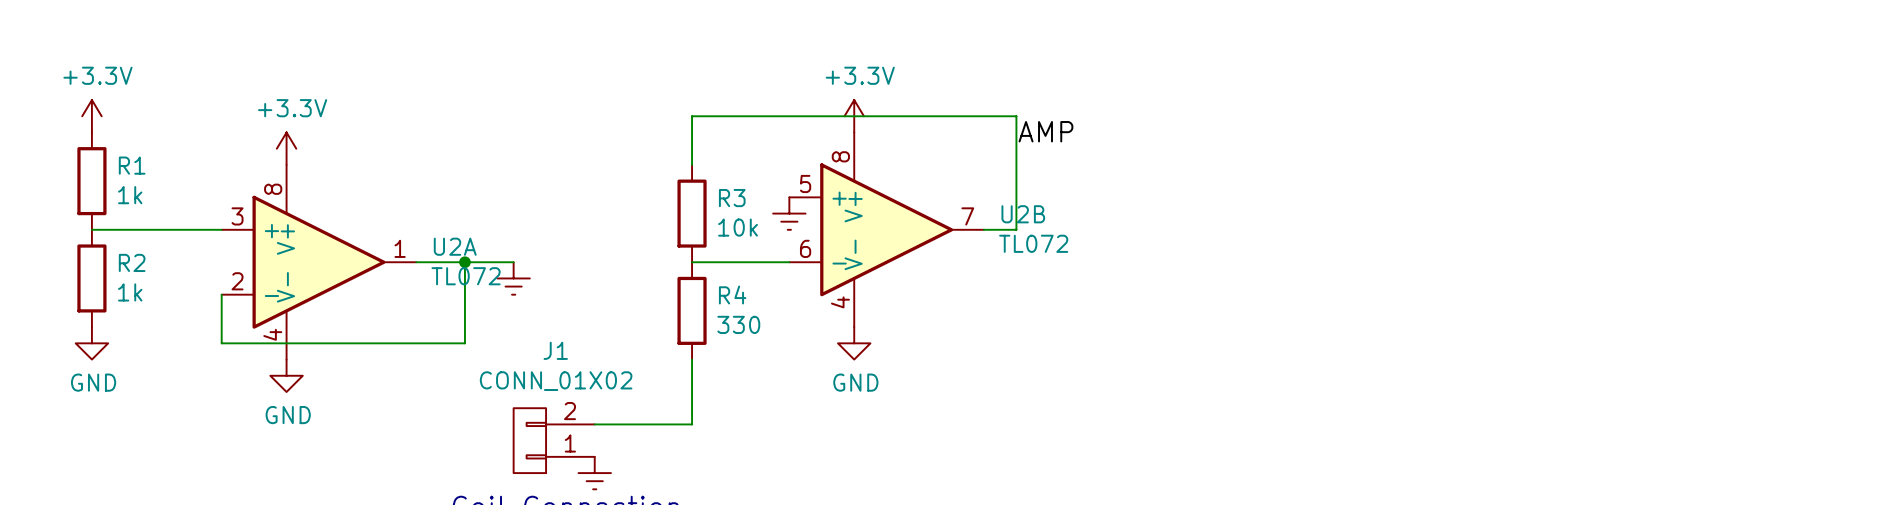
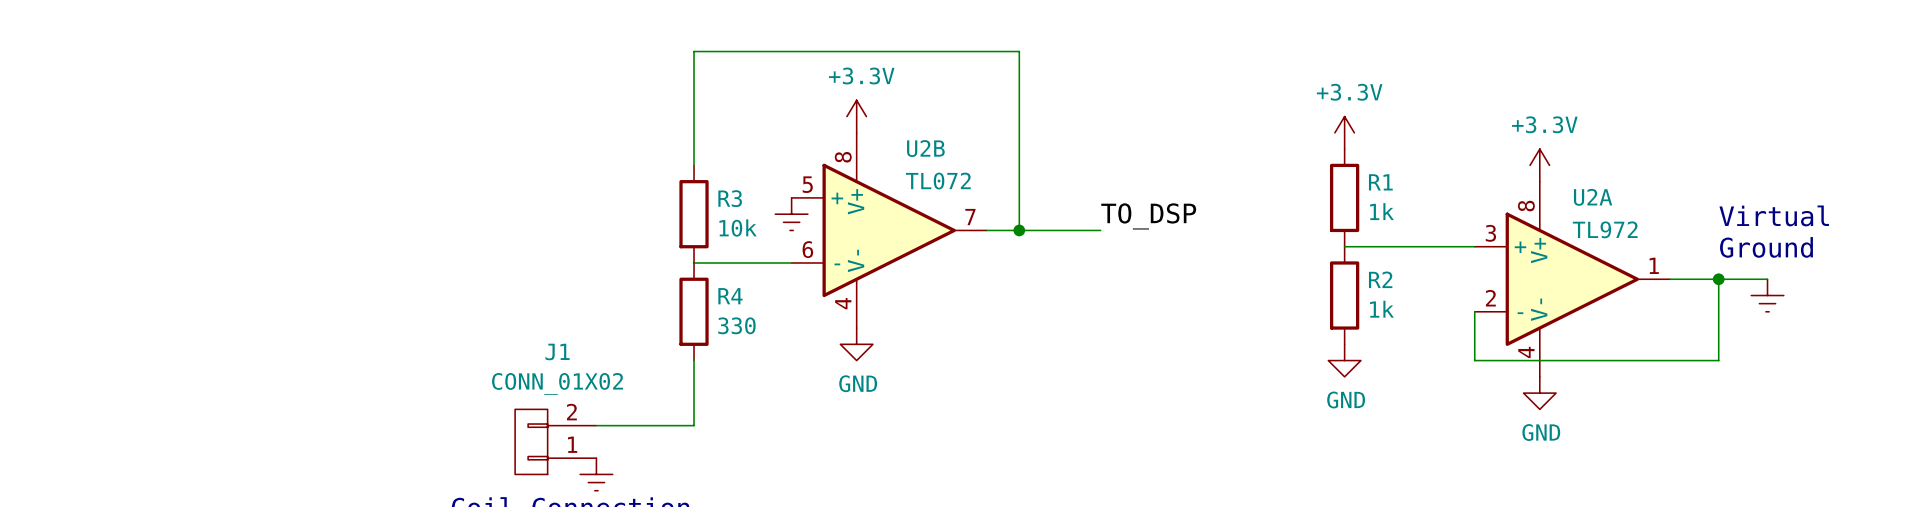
power symbol: +3.3V (91, 116) -> none
wire: (692, 116) (1016, 116) -> (694, 116) (694, 51) (1019, 51) (1019, 116)
label: AMP (1045, 131) -> none
power symbol: none -> +3.3V (1344, 132)
power symbol: +3.3V (286, 148) -> none
power symbol: none -> +3.3V (1539, 165)
R1 position: (91, 181) -> (1344, 197)
label: none -> TO_DSP (1148, 216)
U2B name position: U2B (1023, 214) -> U2B (925, 148)
text: none -> Virtual (1774, 215)
wire: (91, 229) (221, 229) -> none
wire: none -> (1019, 230) (1100, 230)
junction: none -> (1019, 230)
U2B value position: TL072 (1033, 243) -> TL072 (938, 181)
U2A name position: U2A (455, 246) -> U2A (1593, 197)
wire: none -> (1344, 246) (1474, 246)
text: none -> Ground (1766, 247)
U2A position: (319, 262) -> (1572, 279)
wire: (416, 262) (513, 262) -> none
wire: (464, 262) (464, 343) (221, 343) (221, 294) -> none
junction: (464, 262) -> none
U2A value: TL072 (466, 276) -> TL972 (1605, 229)
R2 position: (91, 278) -> (1344, 295)
power symbol: (513, 278) -> none
wire: none -> (1669, 279) (1767, 279)
wire: none -> (1718, 279) (1718, 360) (1474, 360) (1474, 311)
junction: none -> (1718, 279)
power symbol: none -> (1767, 295)
power symbol: GND (91, 343) -> none
power symbol: none -> GND (1344, 360)
power symbol: GND (286, 375) -> none
power symbol: none -> GND (1539, 393)

